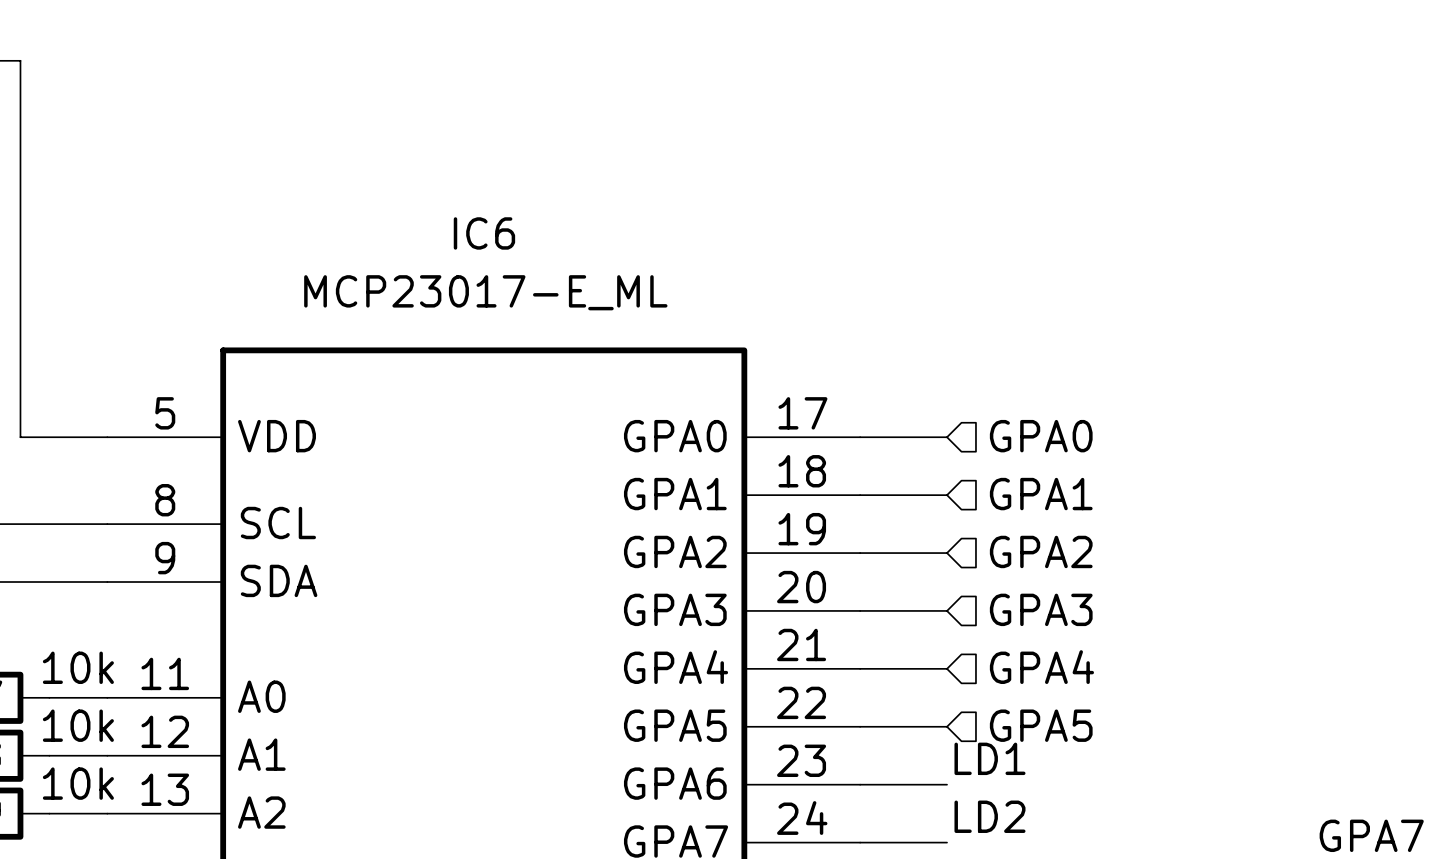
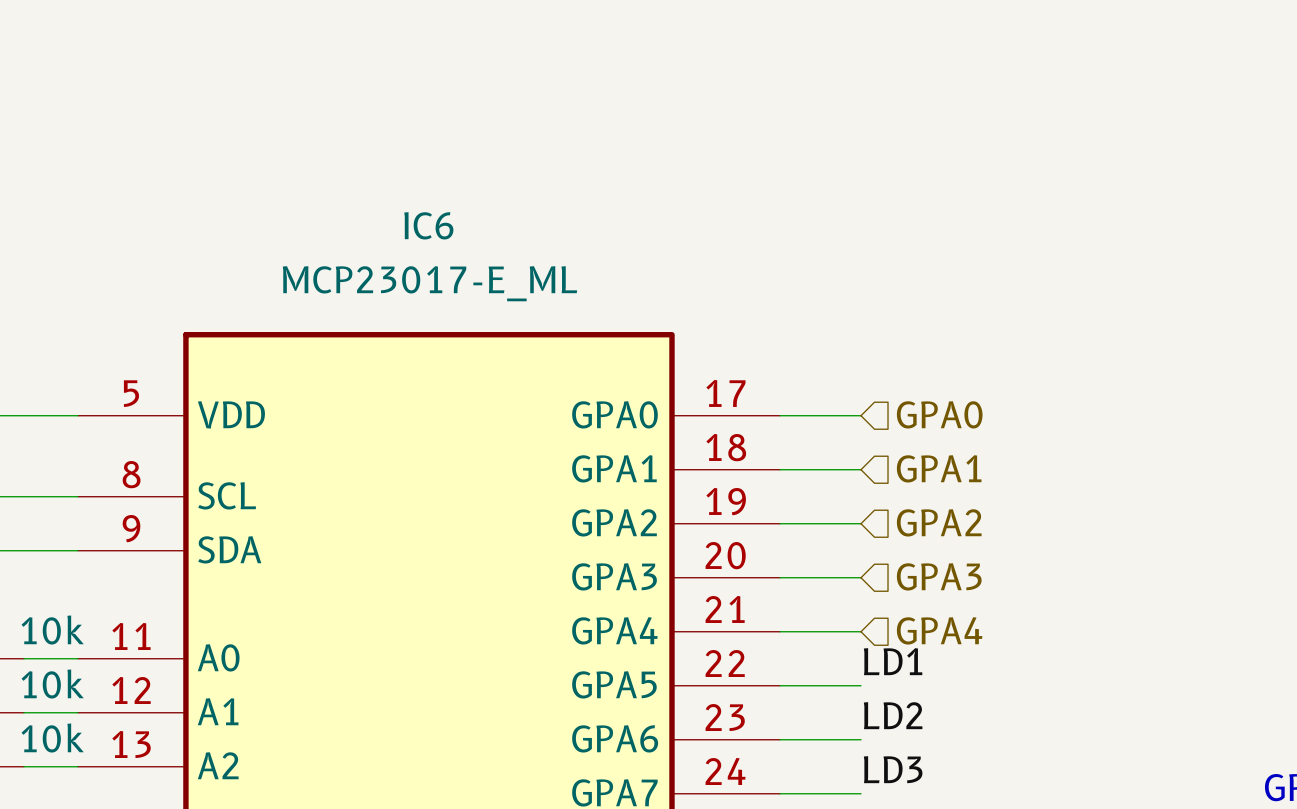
label: none -> LD1 (893, 661)
hierarchical label: GPA5 (1041, 725) -> none
label: LD1 (989, 758) -> LD2 (893, 715)
label: LD2 (989, 816) -> LD3 (893, 769)

